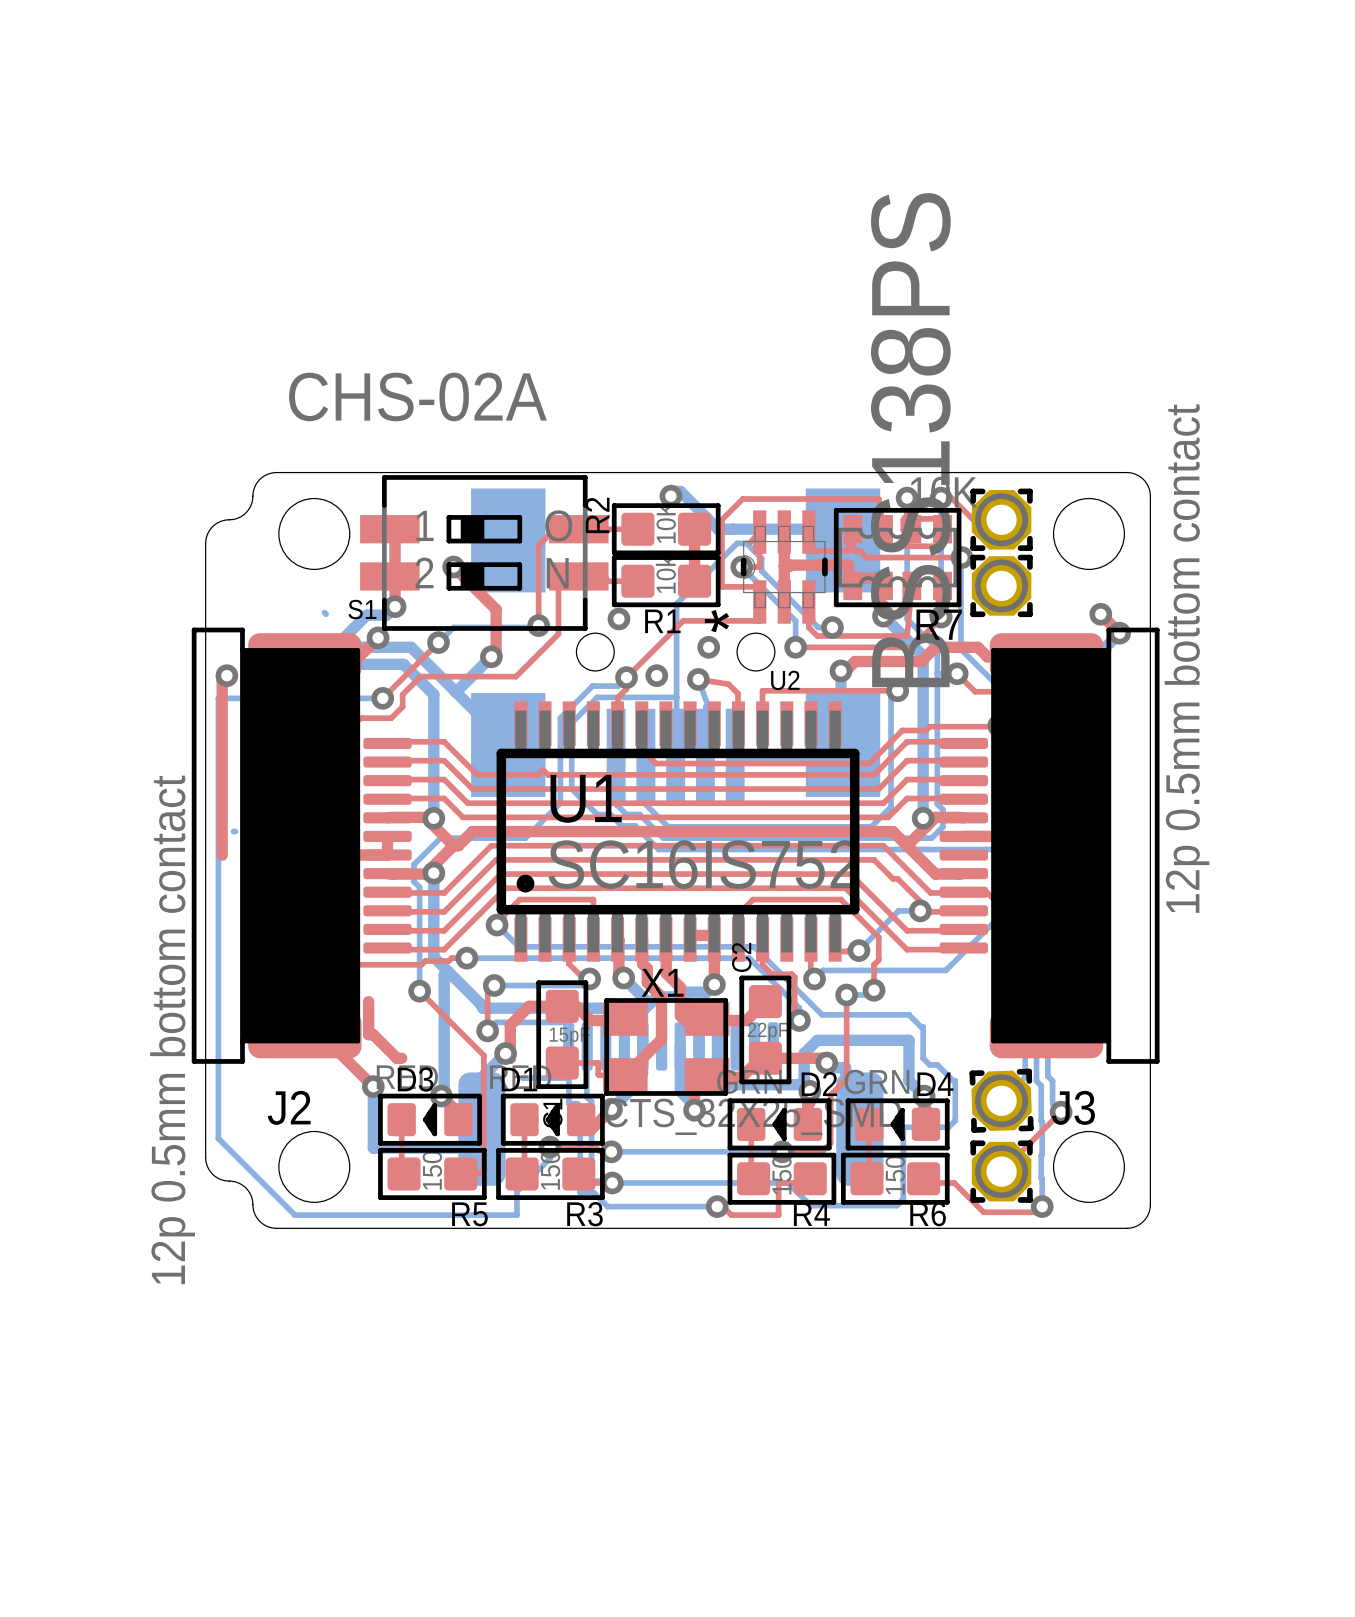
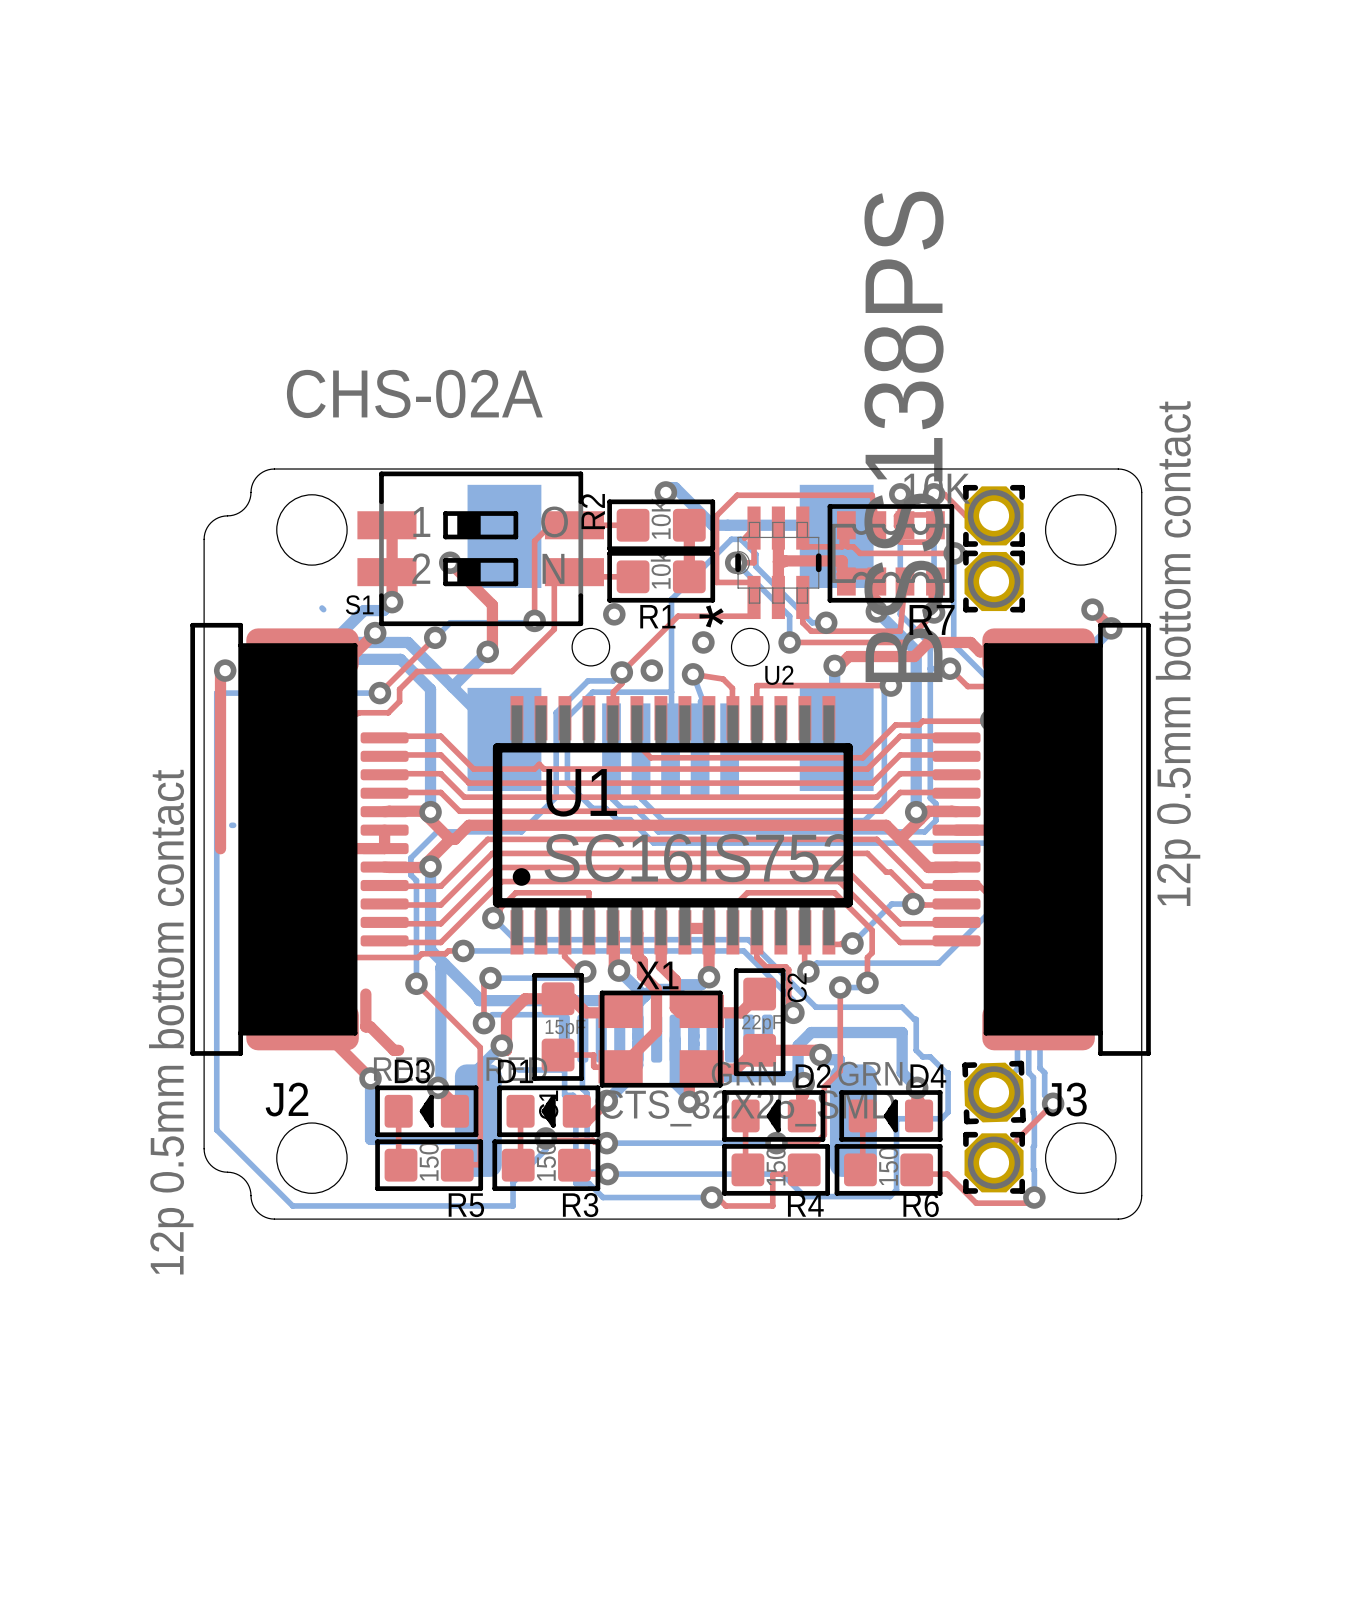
C2 name position: C2 (741, 957) -> C2 (797, 987)

